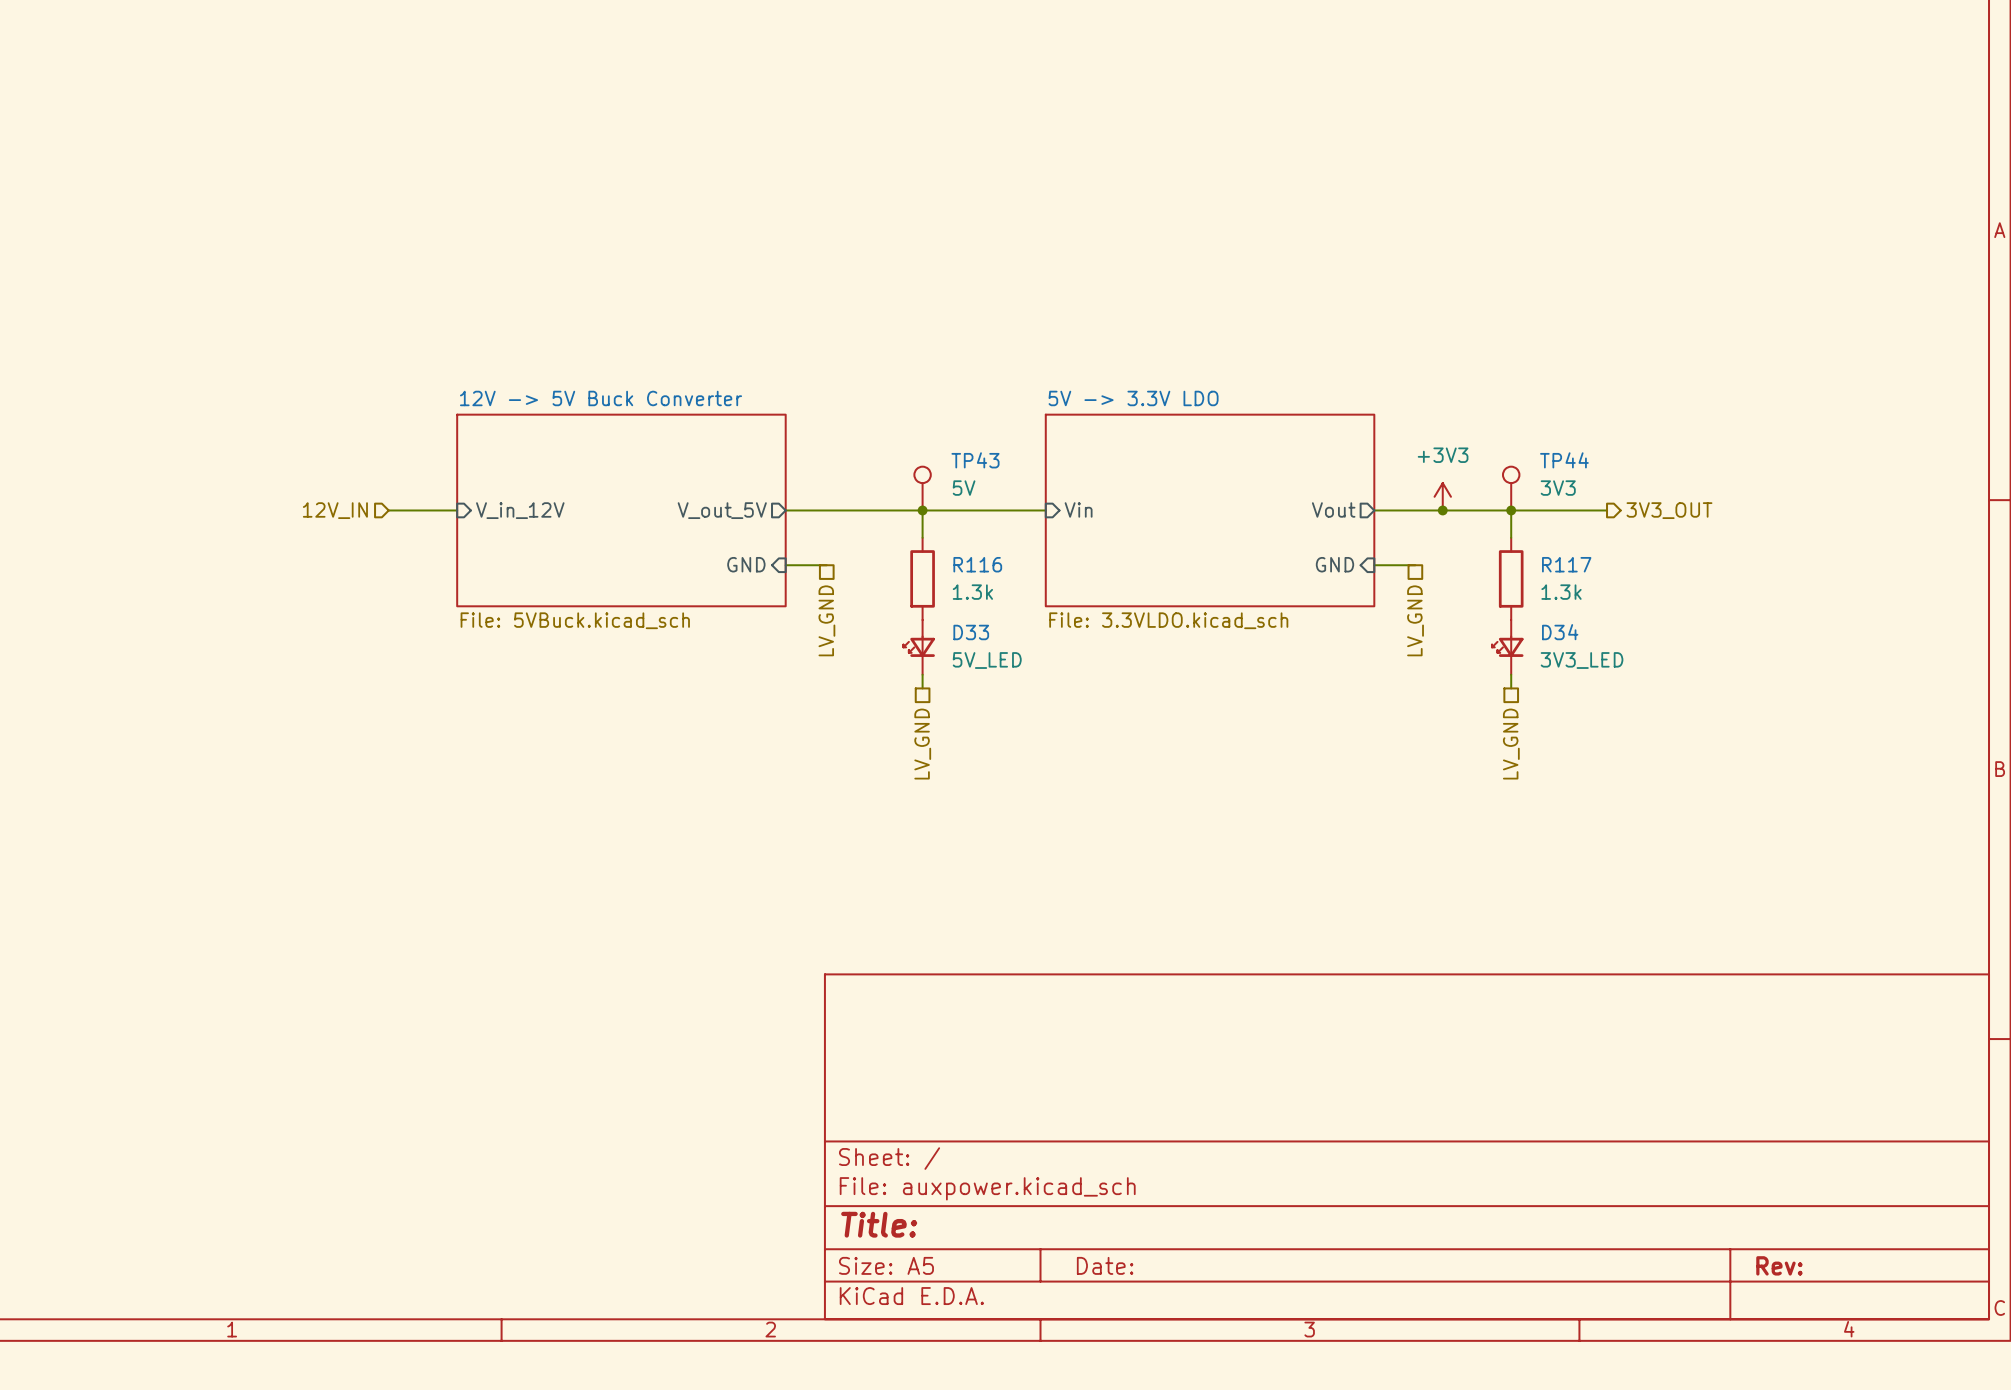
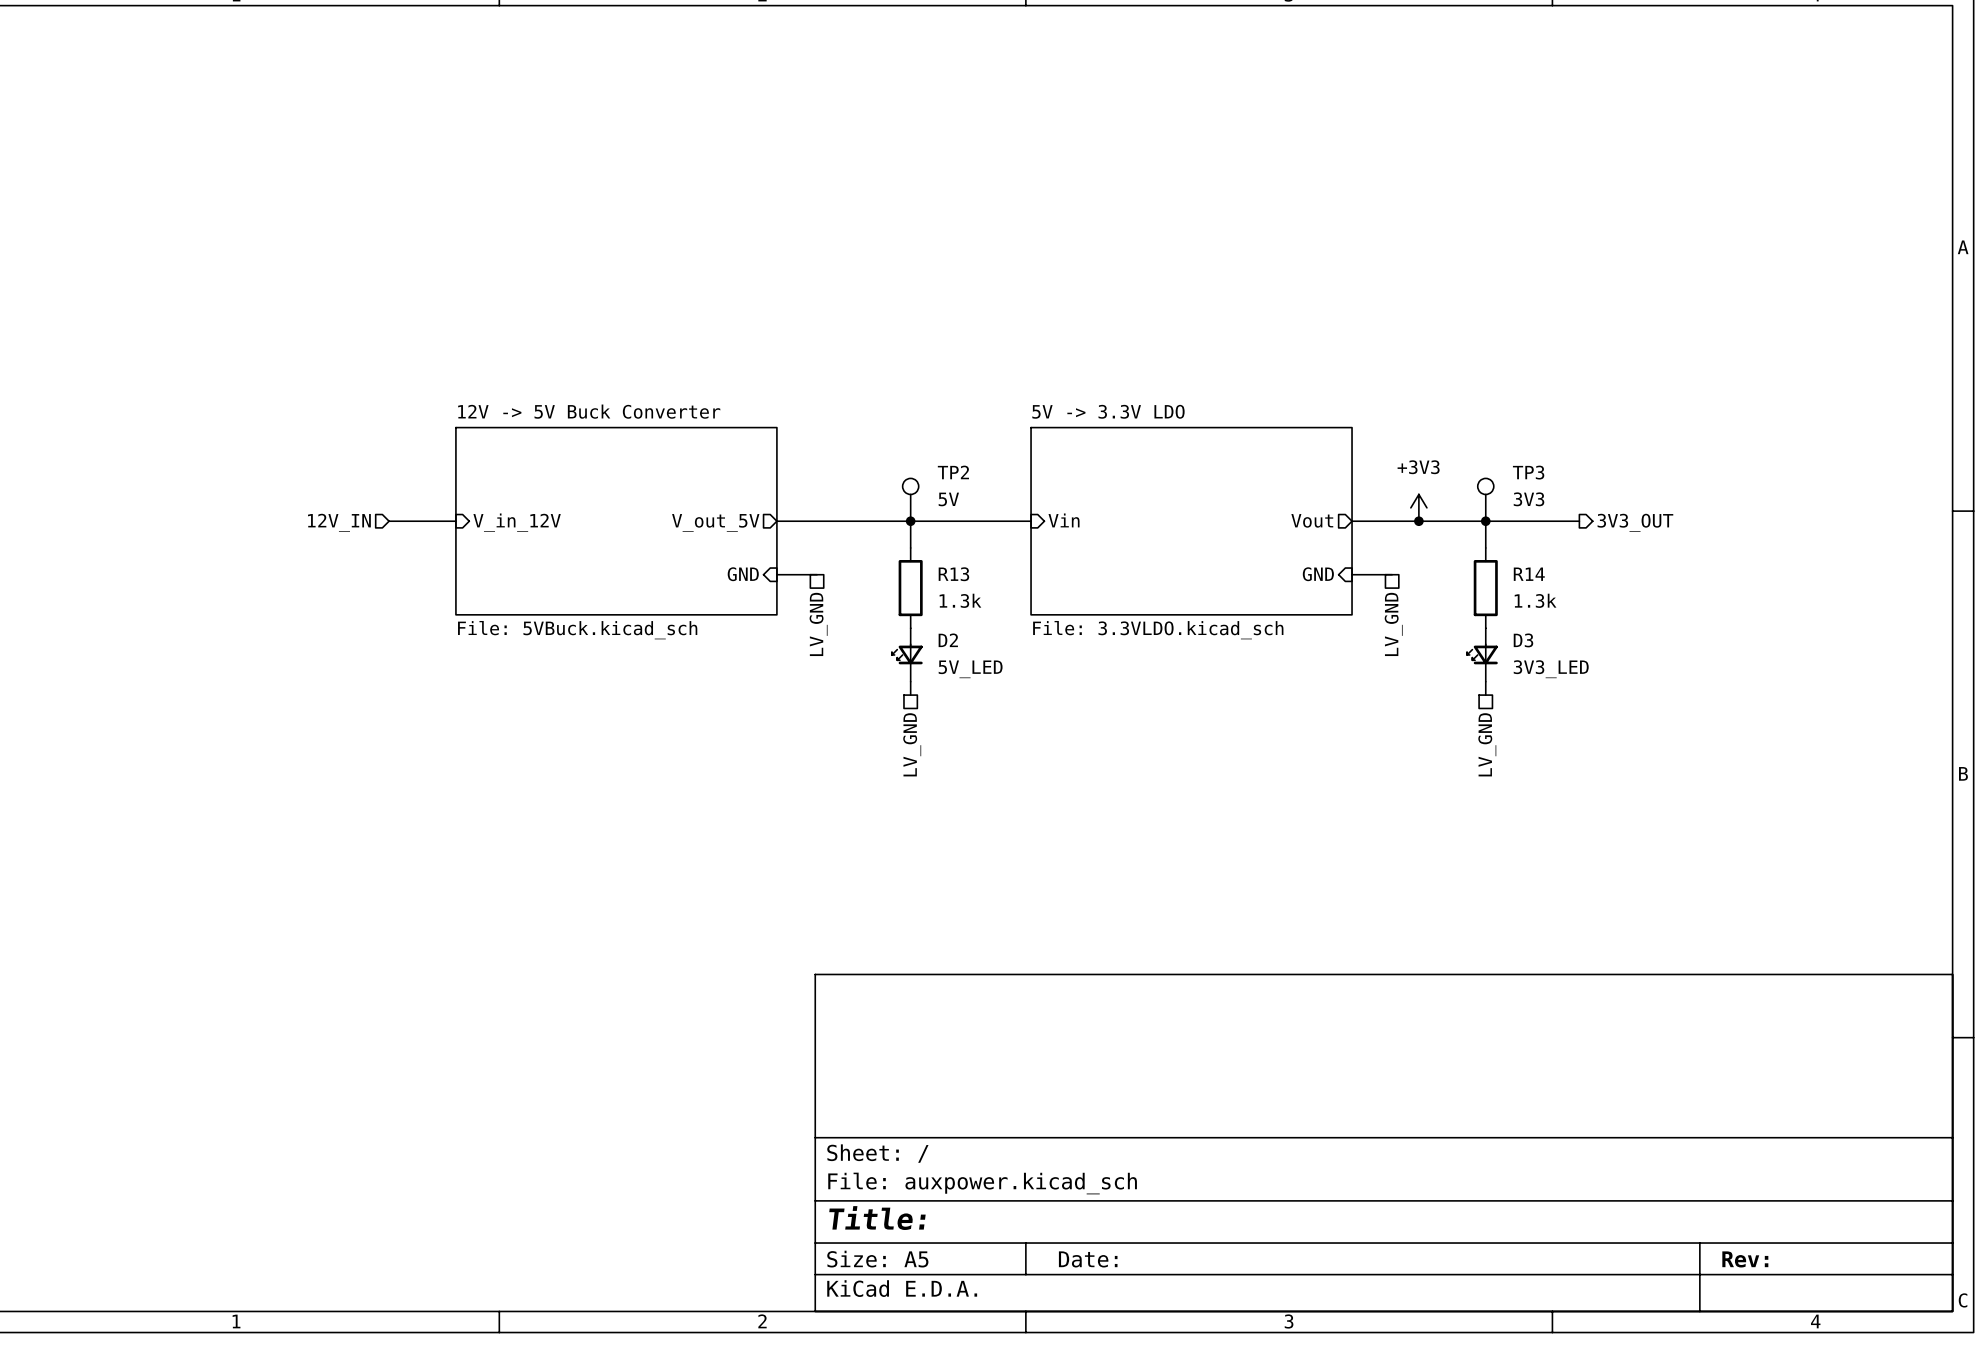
TP43 name: TP43 (975, 460) -> TP2 (953, 472)
TP44 name: TP44 (1564, 460) -> TP3 (1528, 472)
R116 name: R116 (977, 564) -> R13 (953, 574)
R117 name: R117 (1566, 564) -> R14 (1529, 574)
D33 name: D33 (971, 632) -> D2 (948, 640)
D34 name: D34 (1560, 632) -> D3 (1523, 640)

